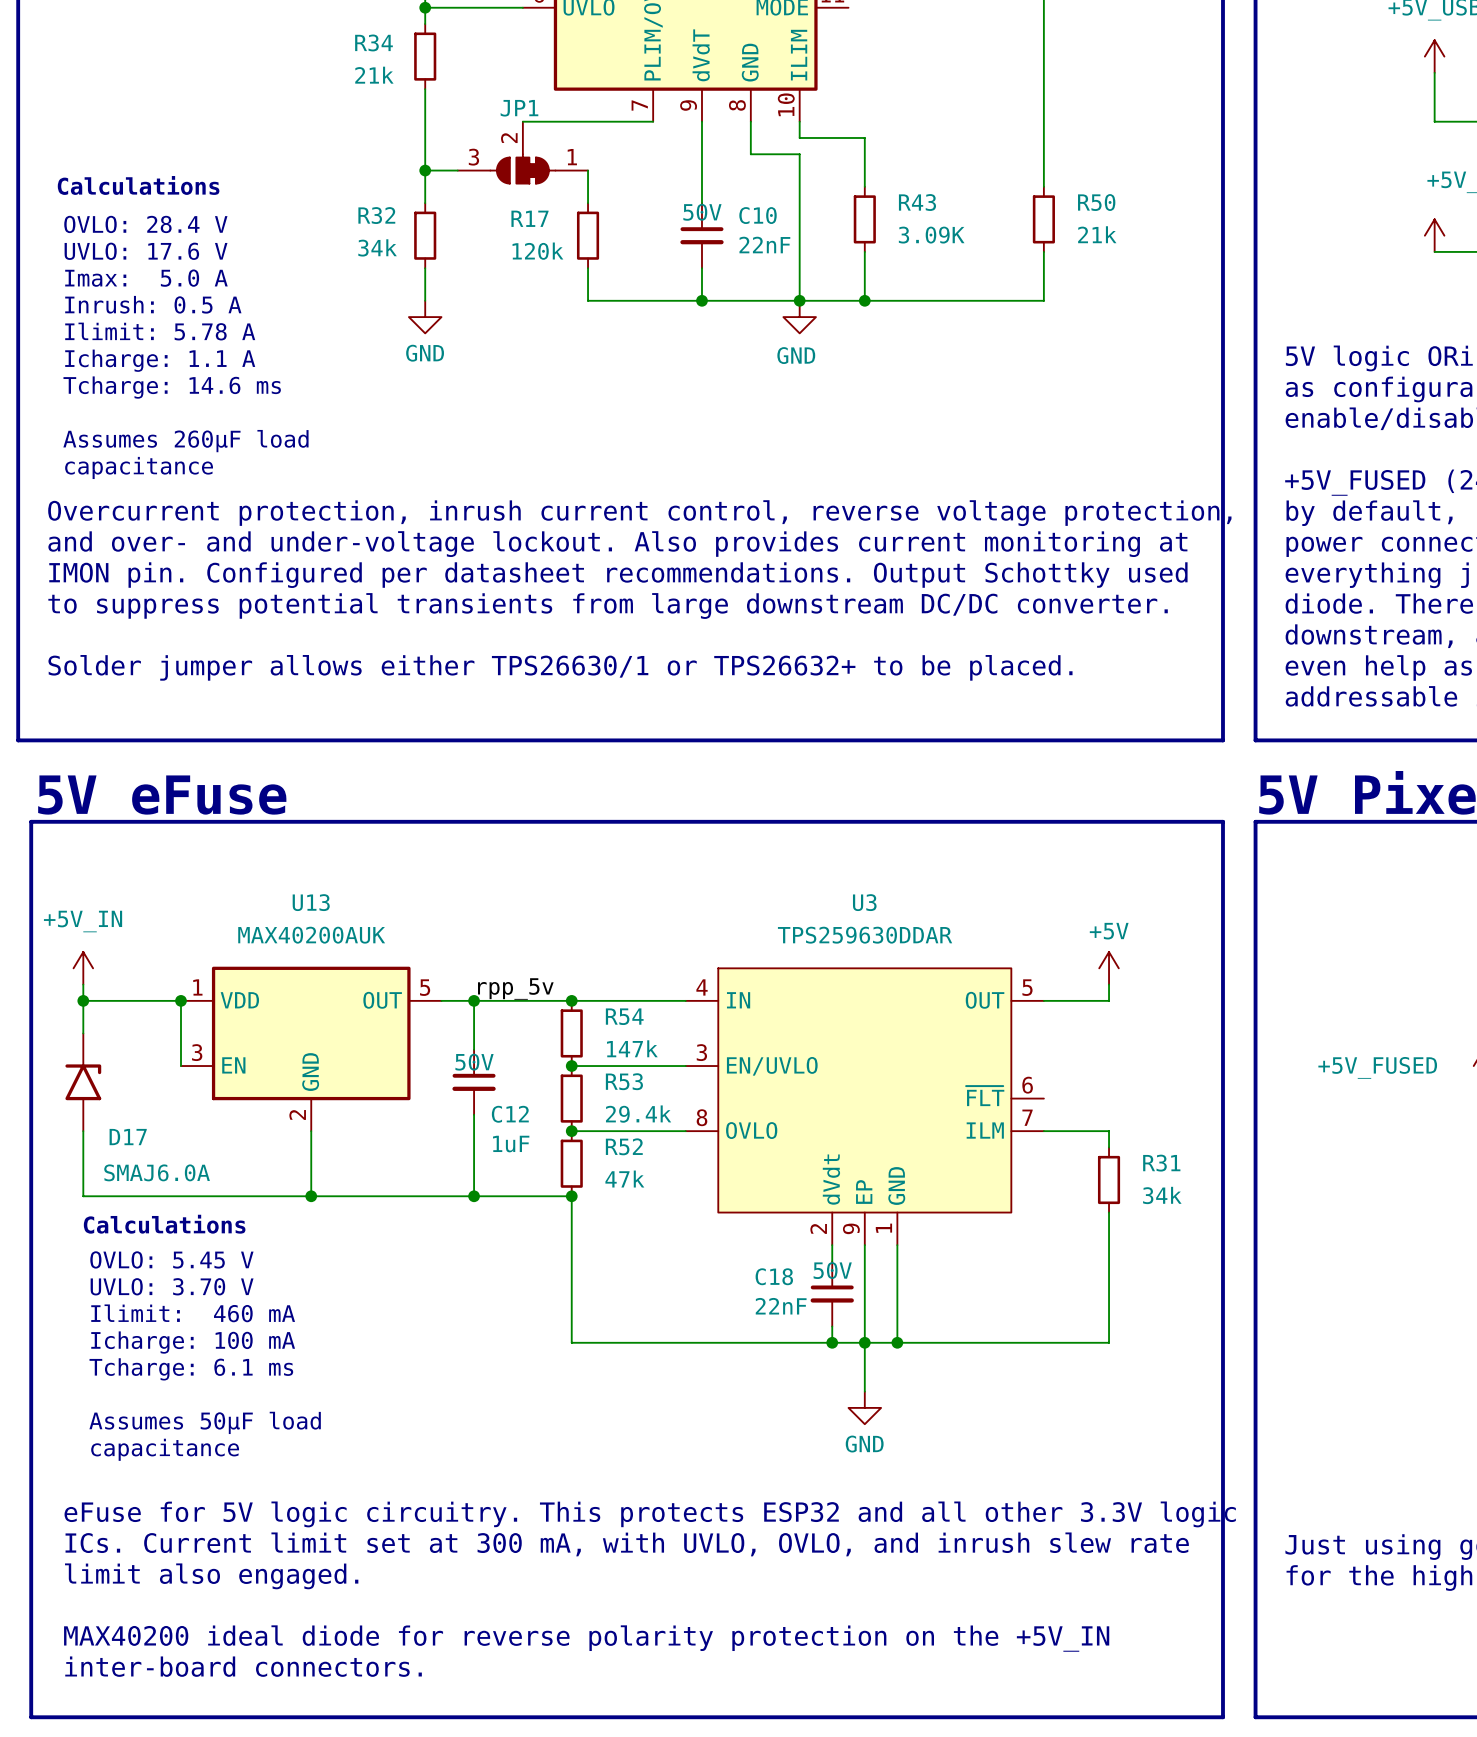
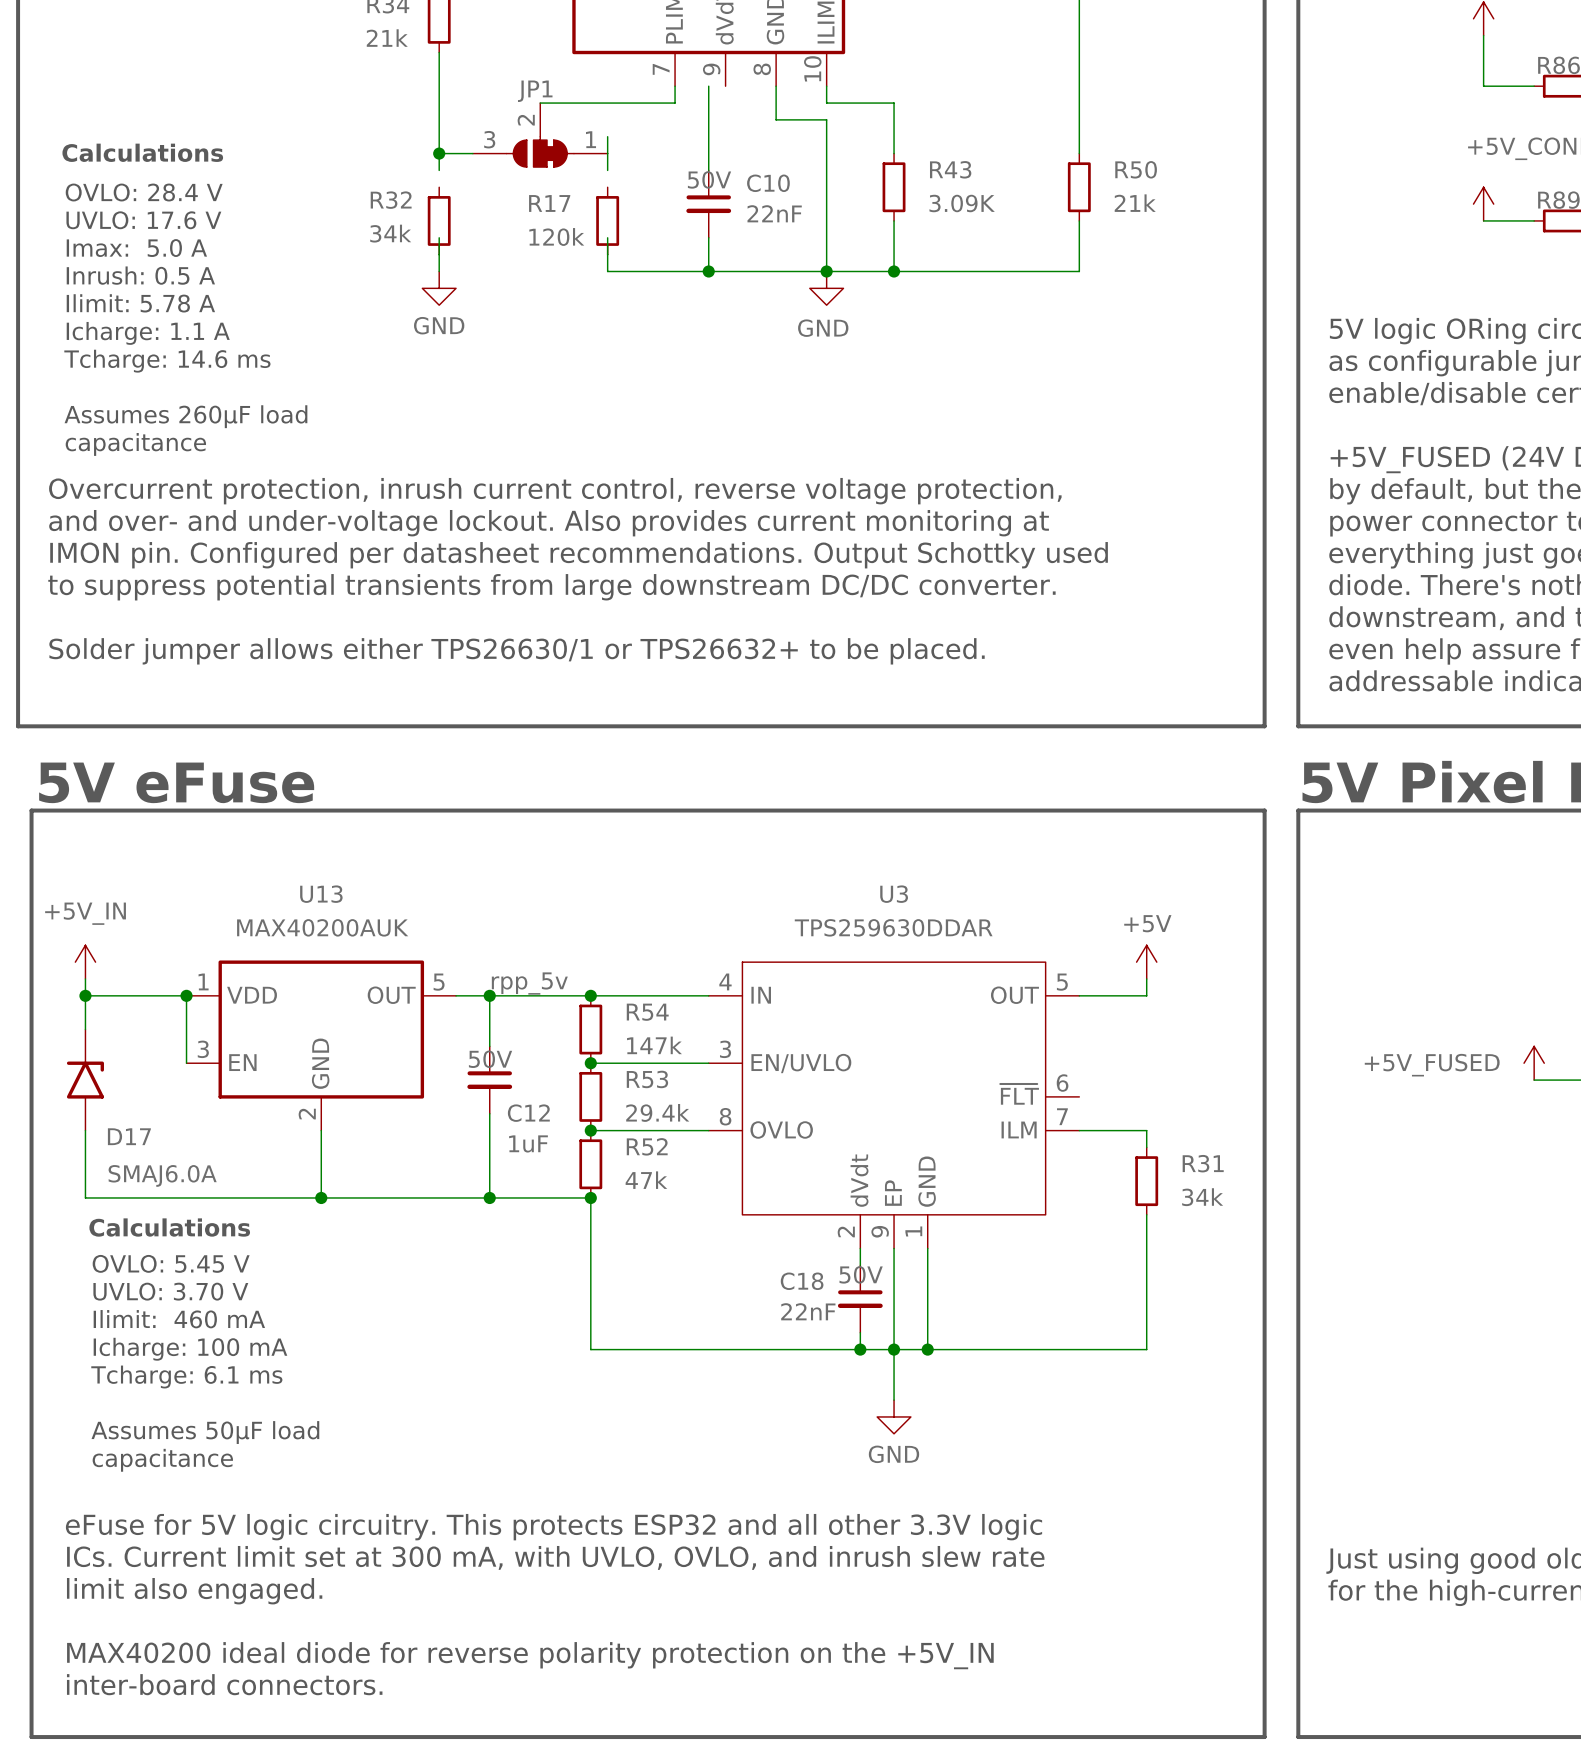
wire: (522, 121) (653, 121) -> (540, 103) (675, 103) (675, 86)
wire: (701, 121) (701, 203) -> (708, 86) (708, 170)
JP1 position: (522, 152) -> (540, 135)
wire: (425, 170) (457, 170) -> (439, 153) (472, 153)
junction position: (425, 170) -> (439, 153)
R32 position: (425, 235) -> (439, 220)
R17 position: (588, 235) -> (607, 220)
C10 position: (701, 235) -> (708, 204)
wire: (701, 268) (701, 300) -> (708, 237) (708, 271)
junction position: (701, 300) -> (708, 271)

